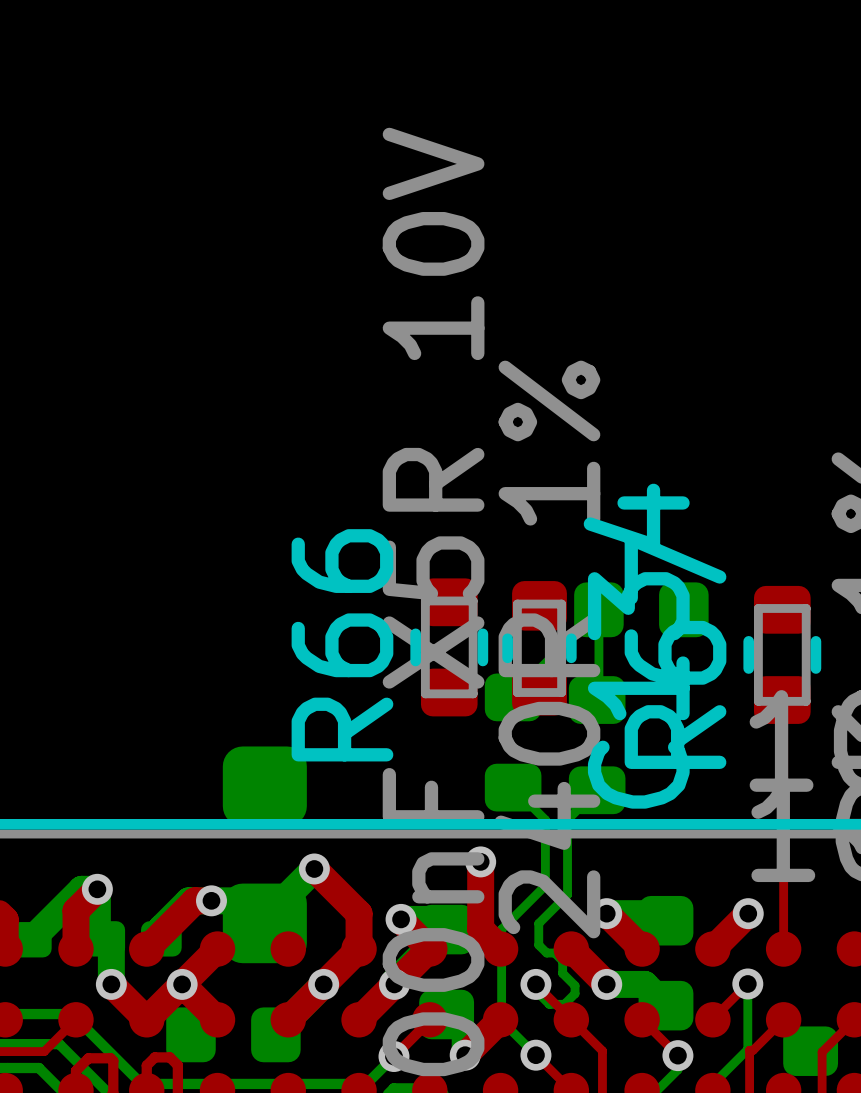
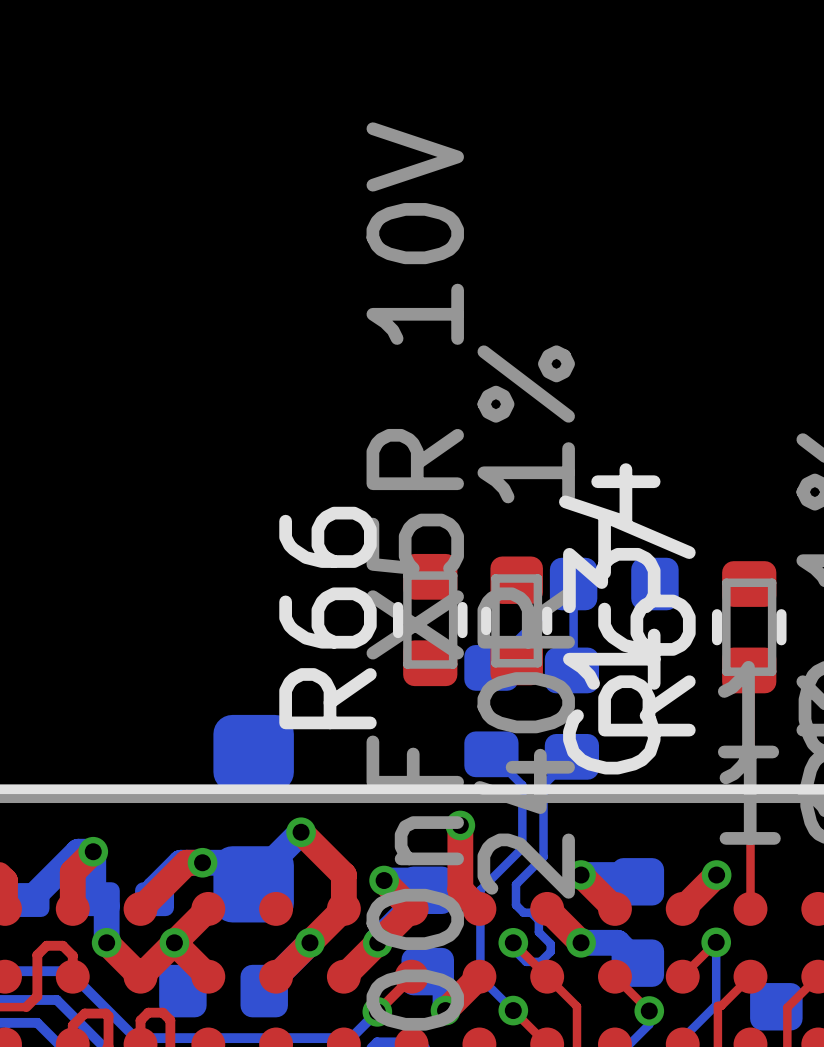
top track: (75, 1019) (44, 1051) (27, 1051) -> (72, 976) (72, 955) (62, 945) (46, 945) (37, 955) (37, 996) (26, 1007)

